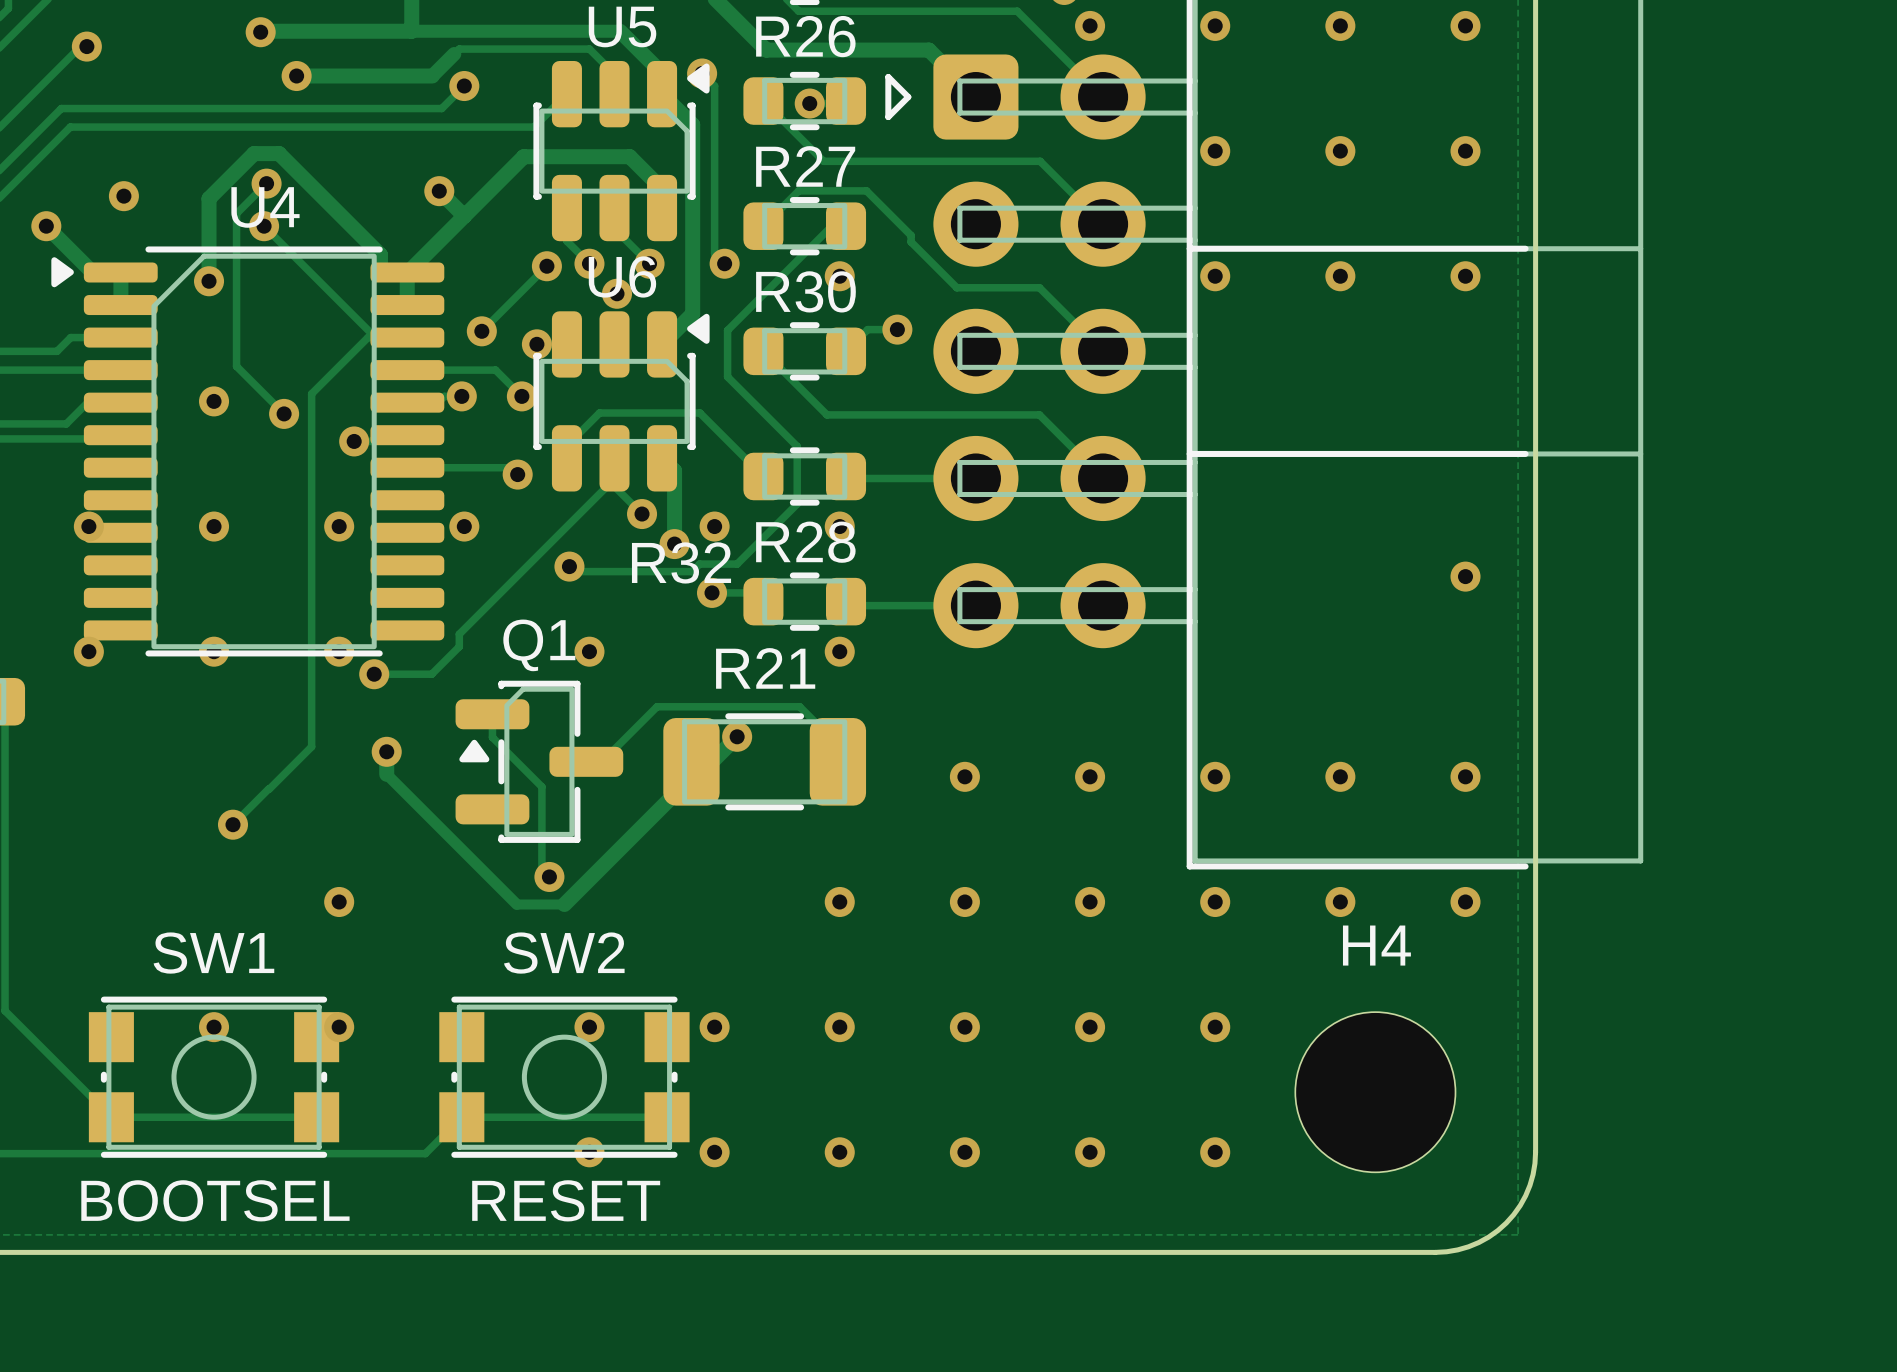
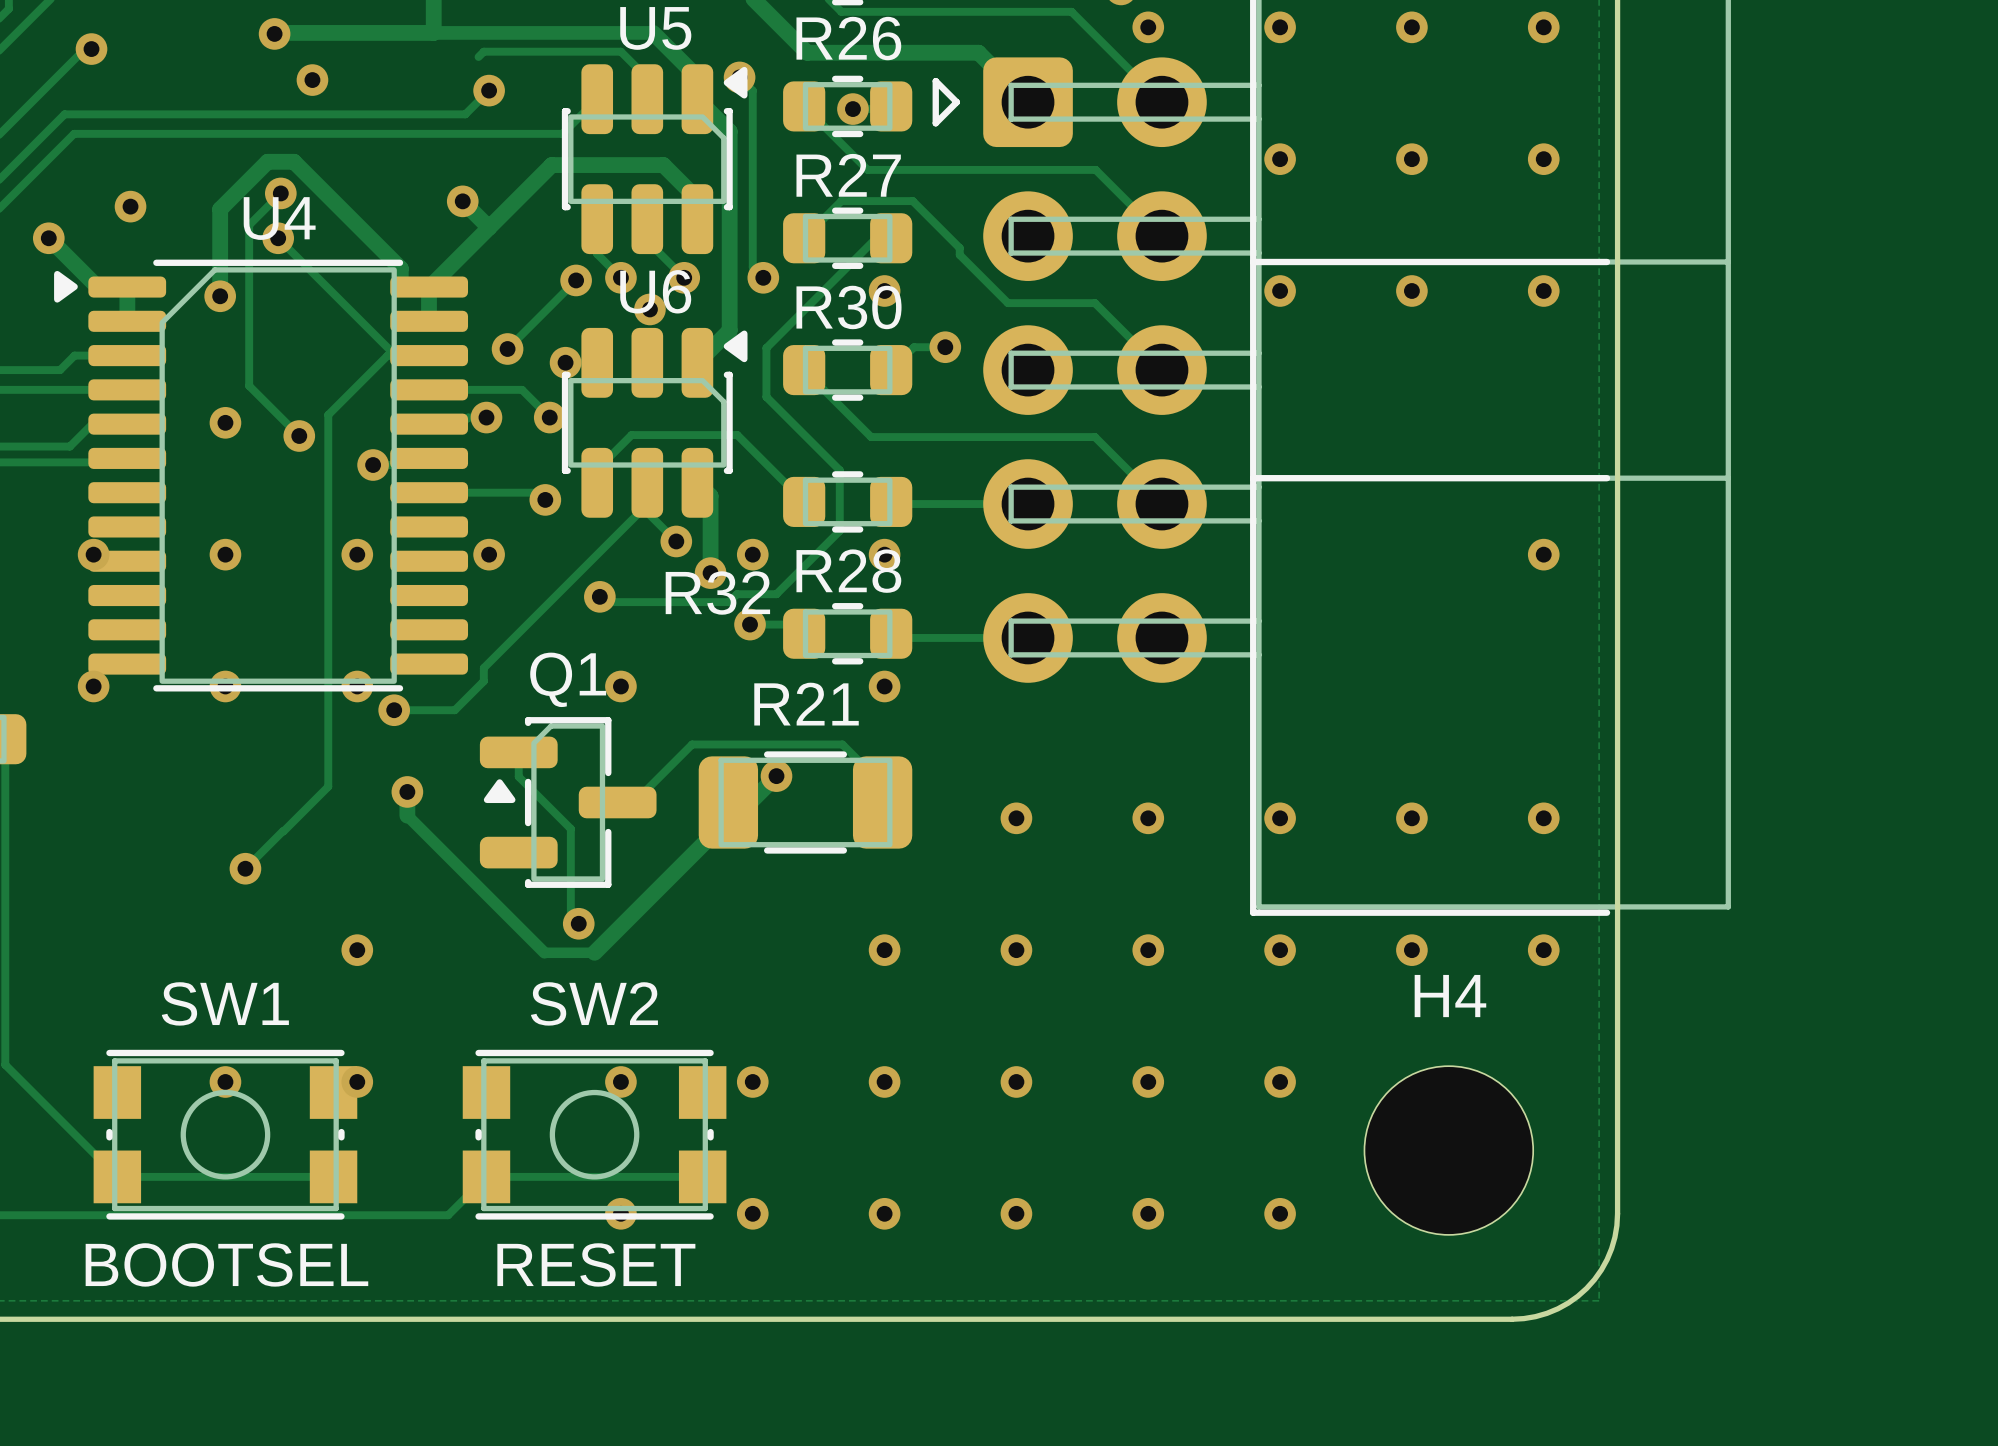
track: (454, 53) (432, 76) (296, 76) -> none
via position: (1465, 576) -> (1543, 554)

